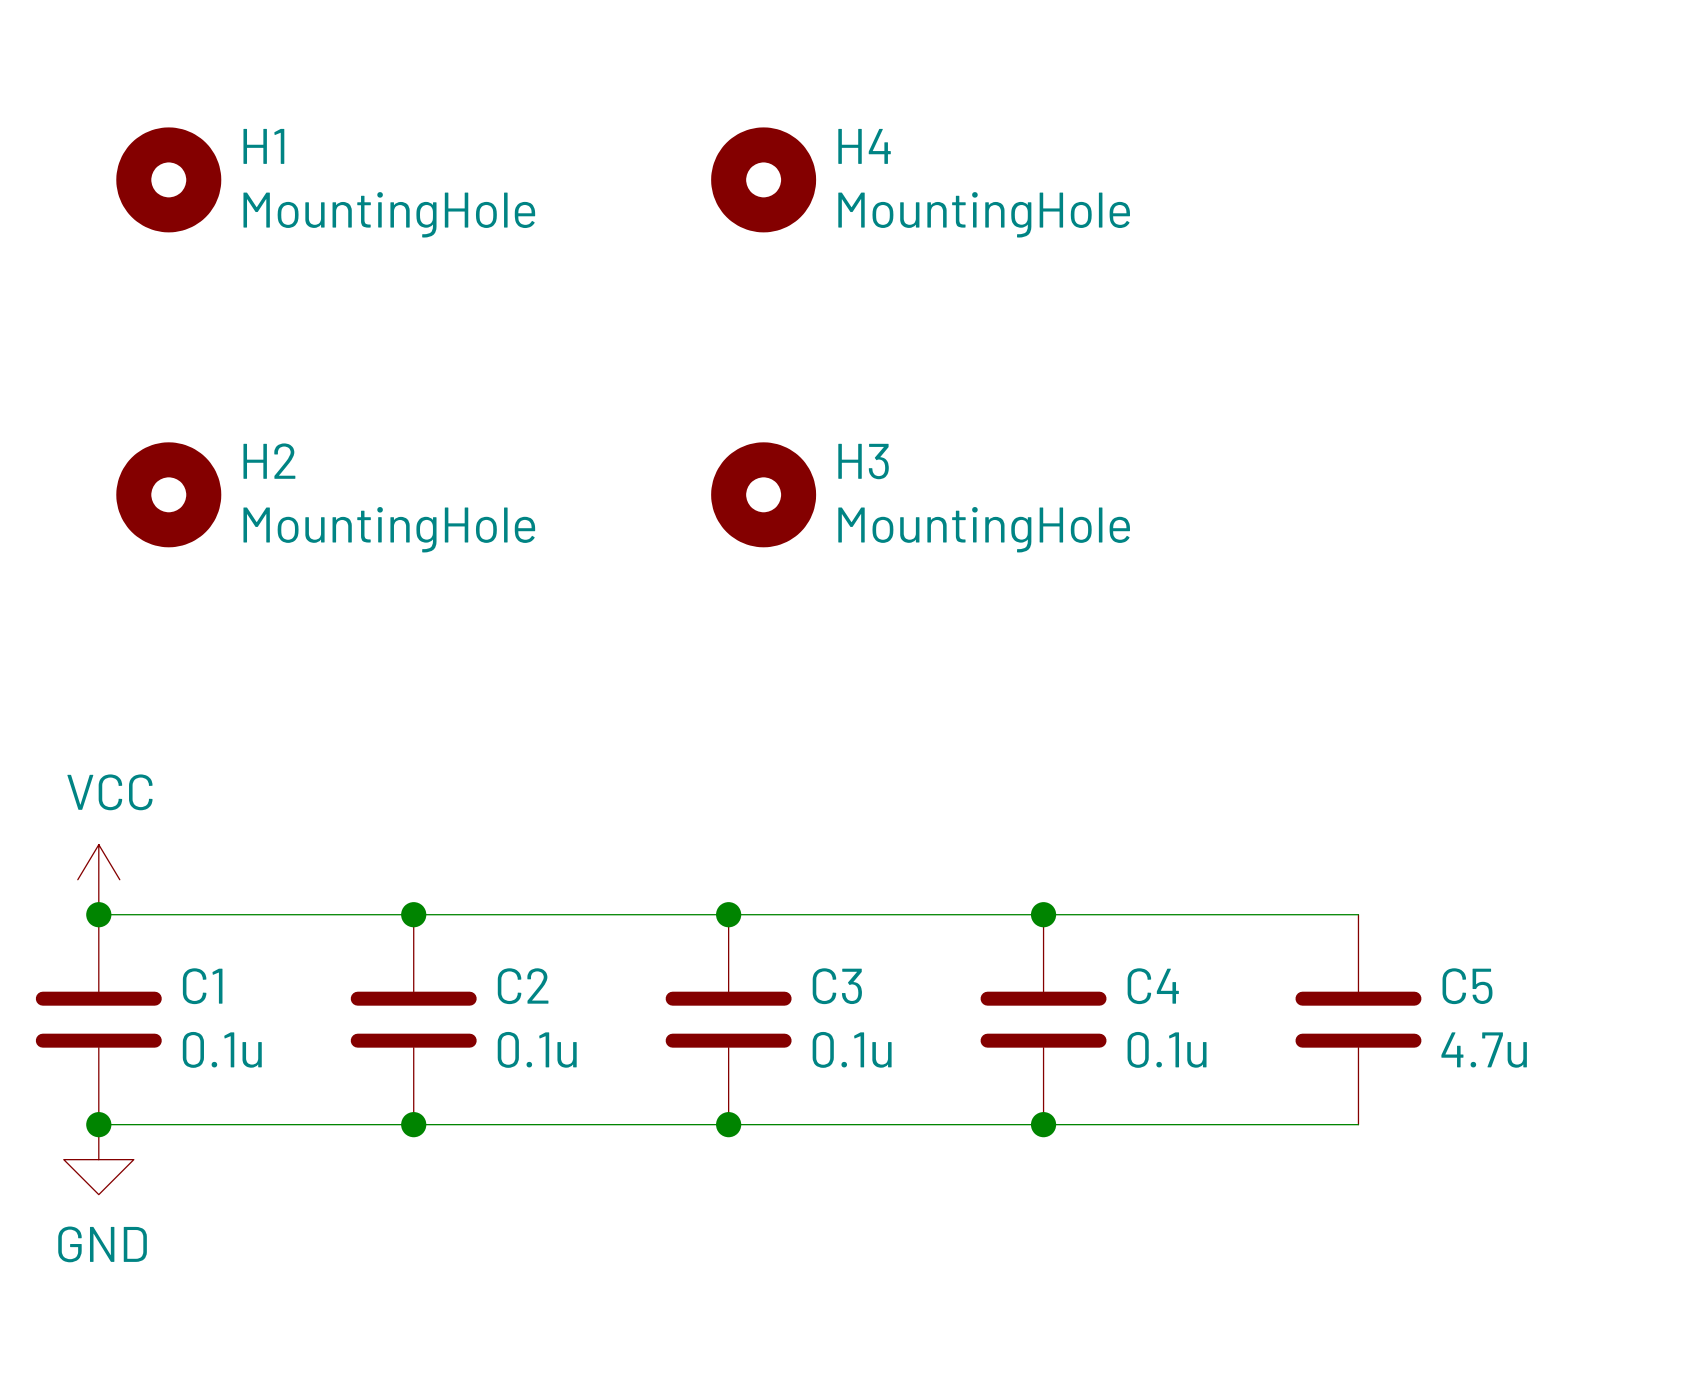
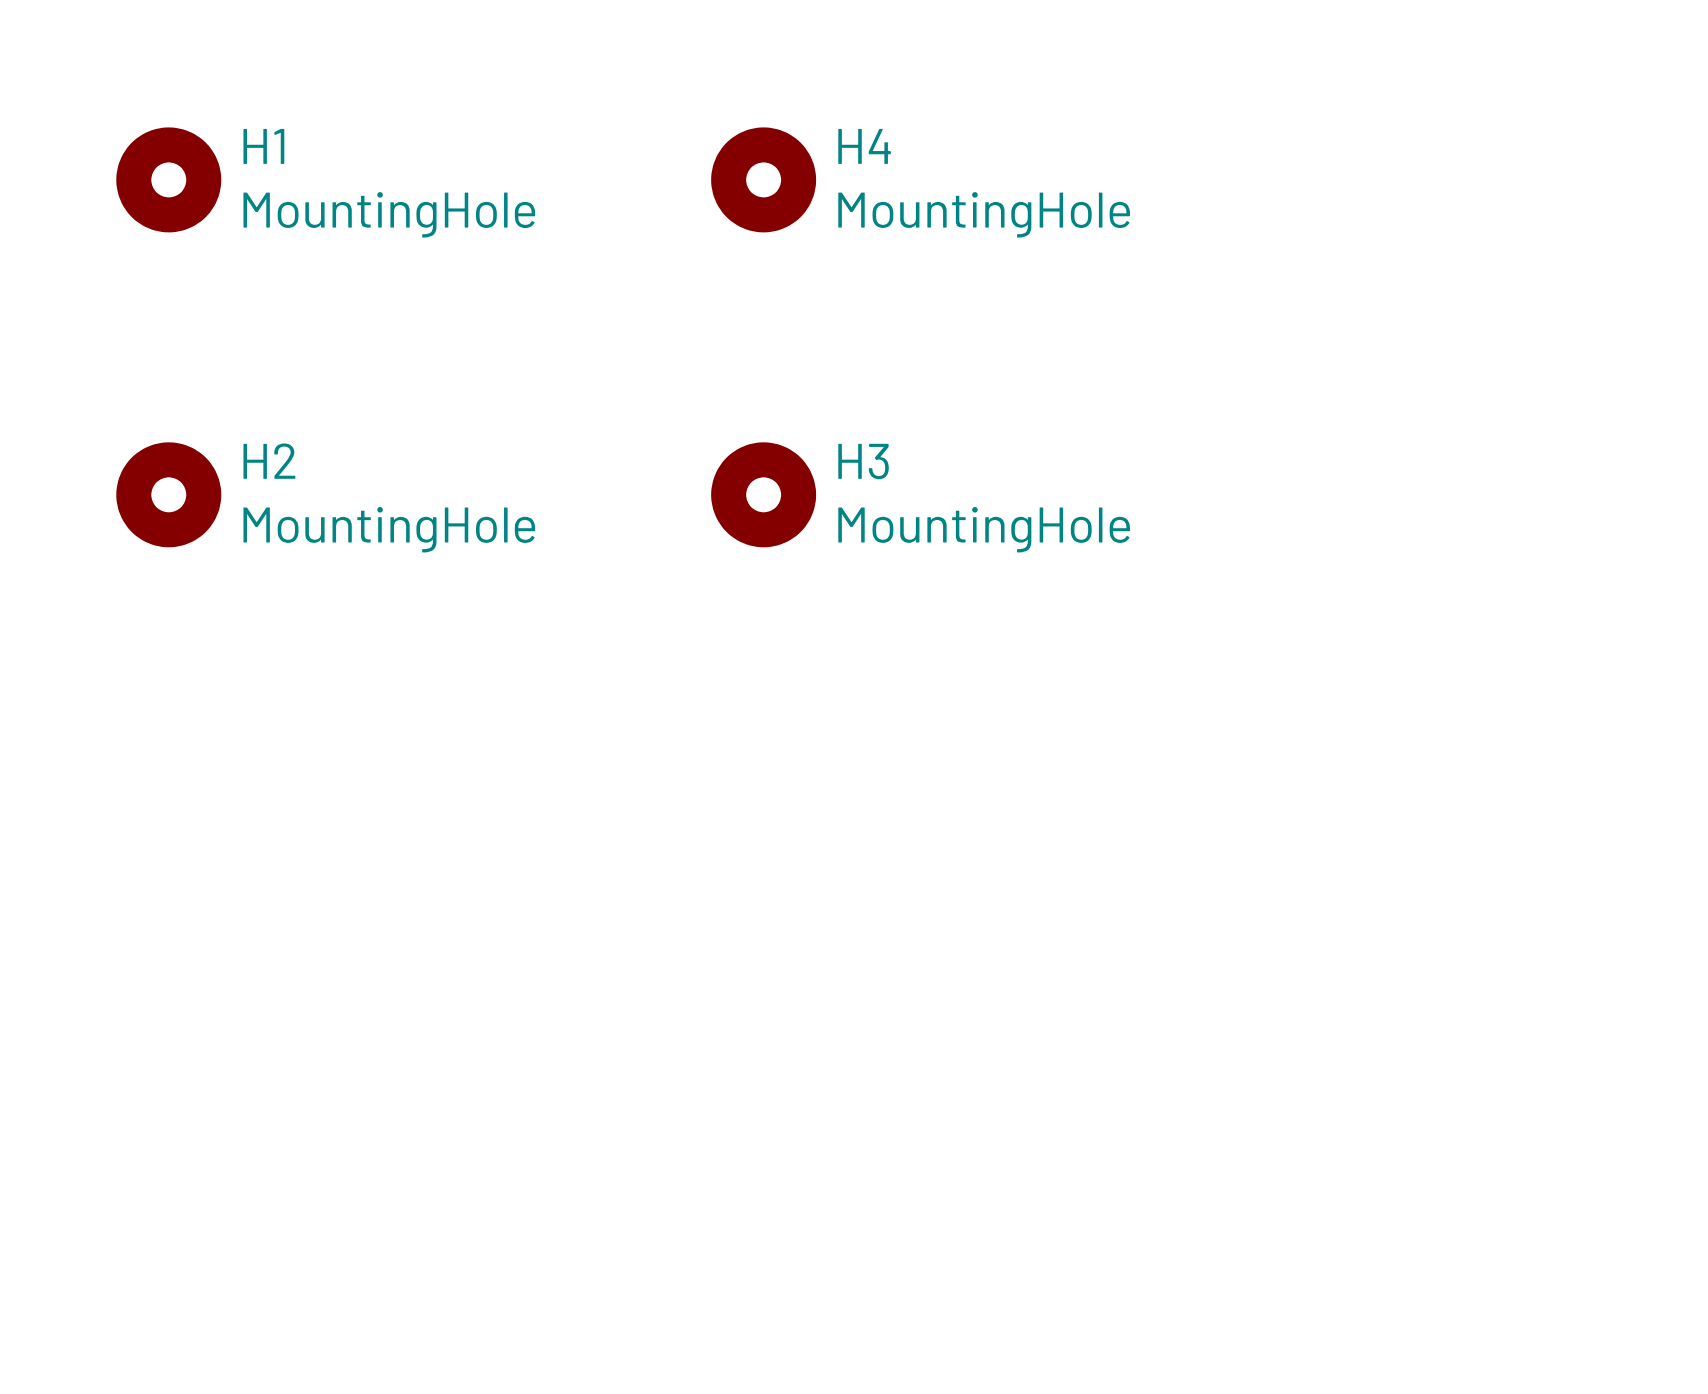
power symbol: VCC (98, 879) -> none
wire: (98, 914) (1358, 914) -> none
junction: (98, 914) -> none
junction: (413, 914) -> none
junction: (728, 914) -> none
junction: (1043, 914) -> none
C1: 0.1u (98, 1019) -> none
C2: 0.1u (413, 1019) -> none
C3: 0.1u (728, 1019) -> none
C4: 0.1u (1043, 1019) -> none
C5: 4.7u (1358, 1019) -> none
wire: (98, 1124) (1358, 1124) -> none
junction: (98, 1124) -> none
junction: (413, 1124) -> none
junction: (728, 1124) -> none
junction: (1043, 1124) -> none
power symbol: GND (98, 1159) -> none

